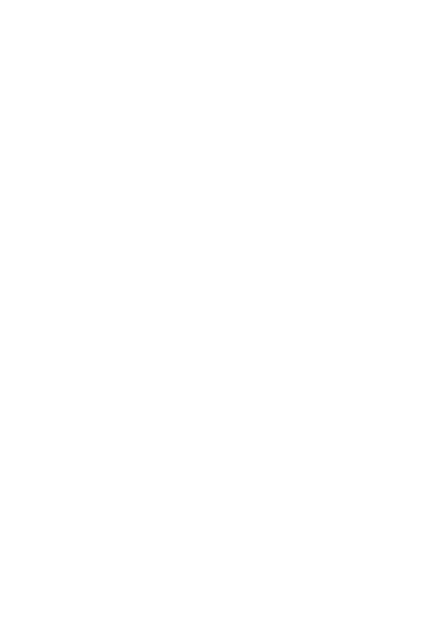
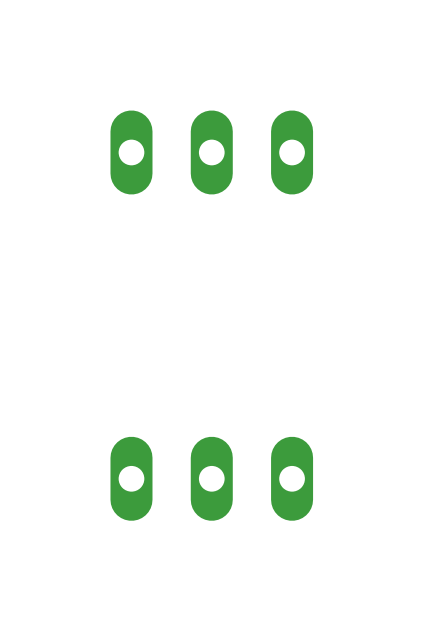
part: none -> (211, 152)
part: none -> (211, 478)

